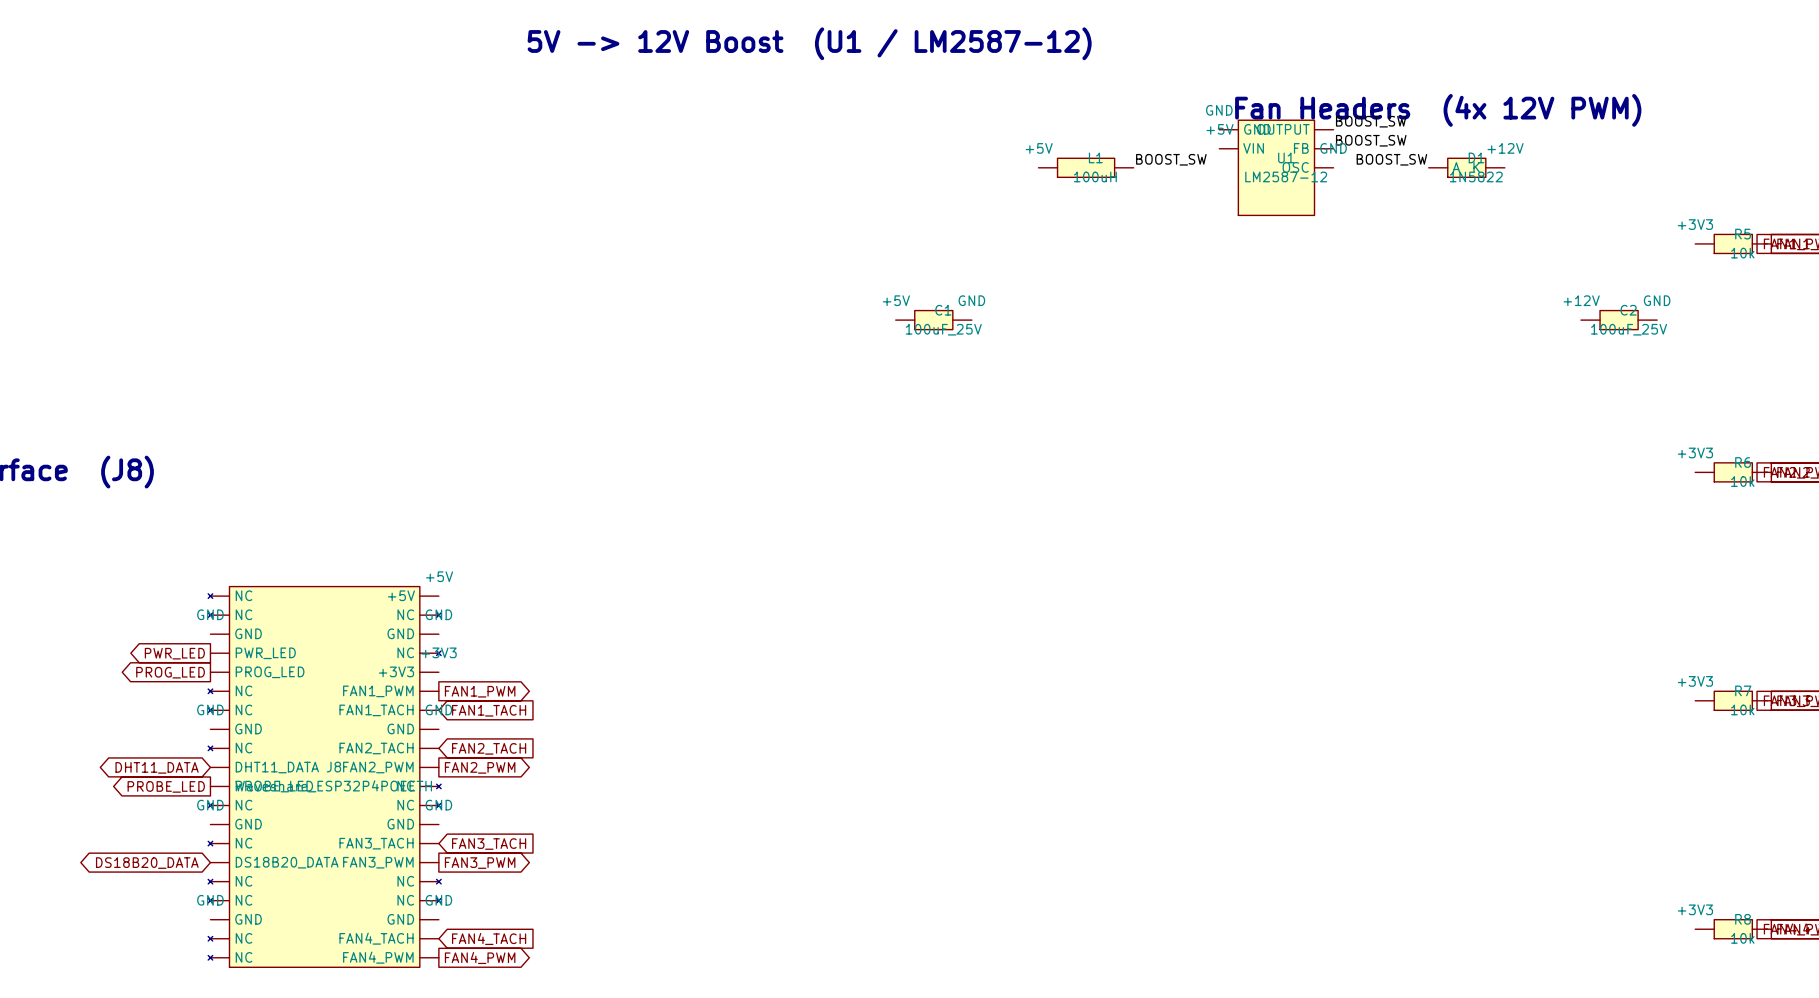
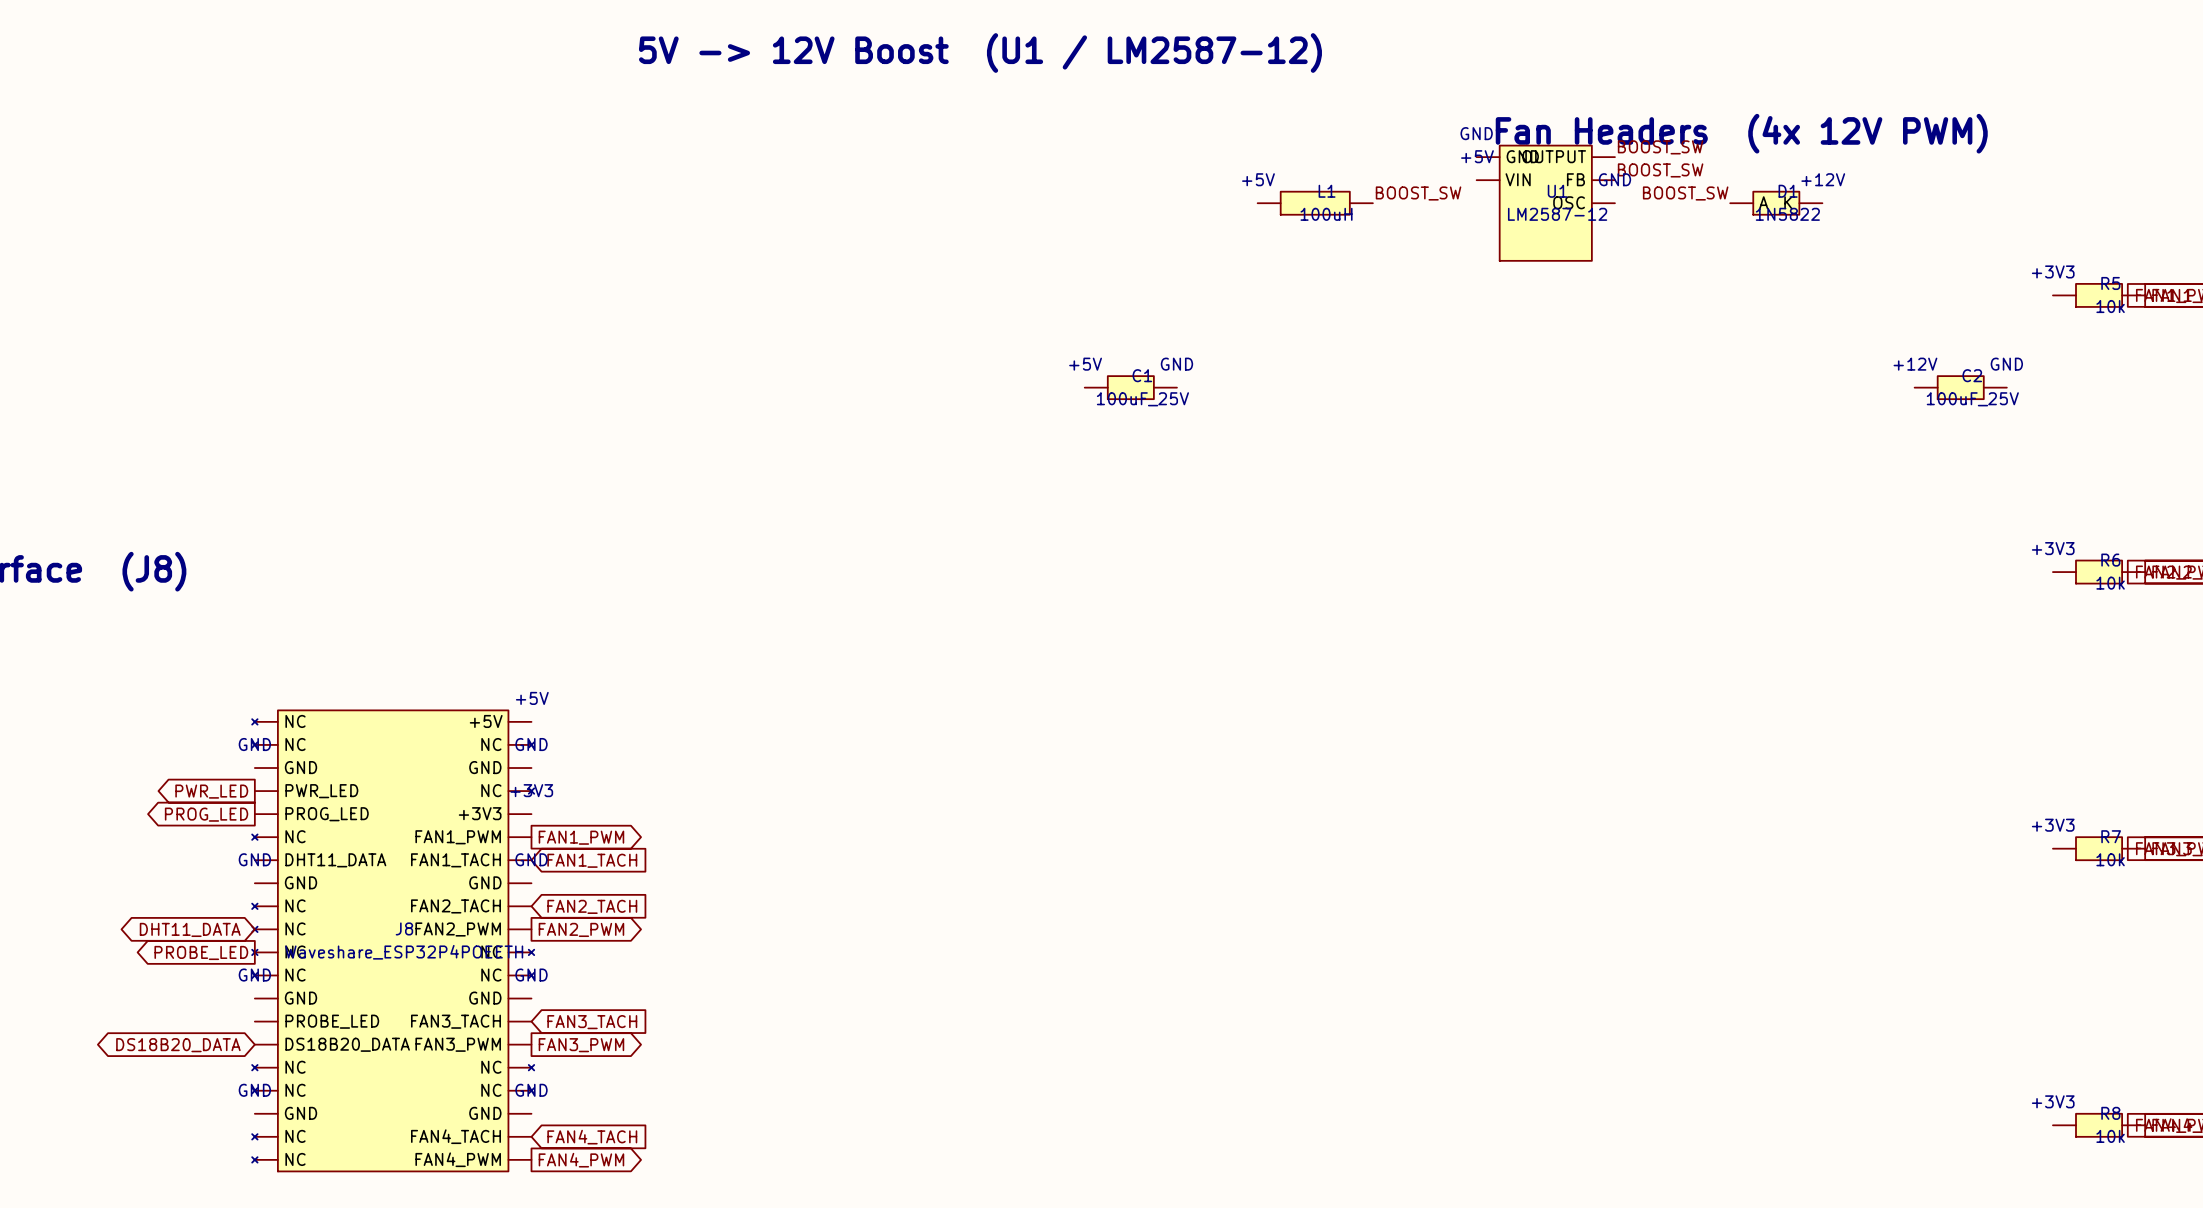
J8 symbol: [208, 586, 442, 968] -> [252, 710, 535, 1172]

